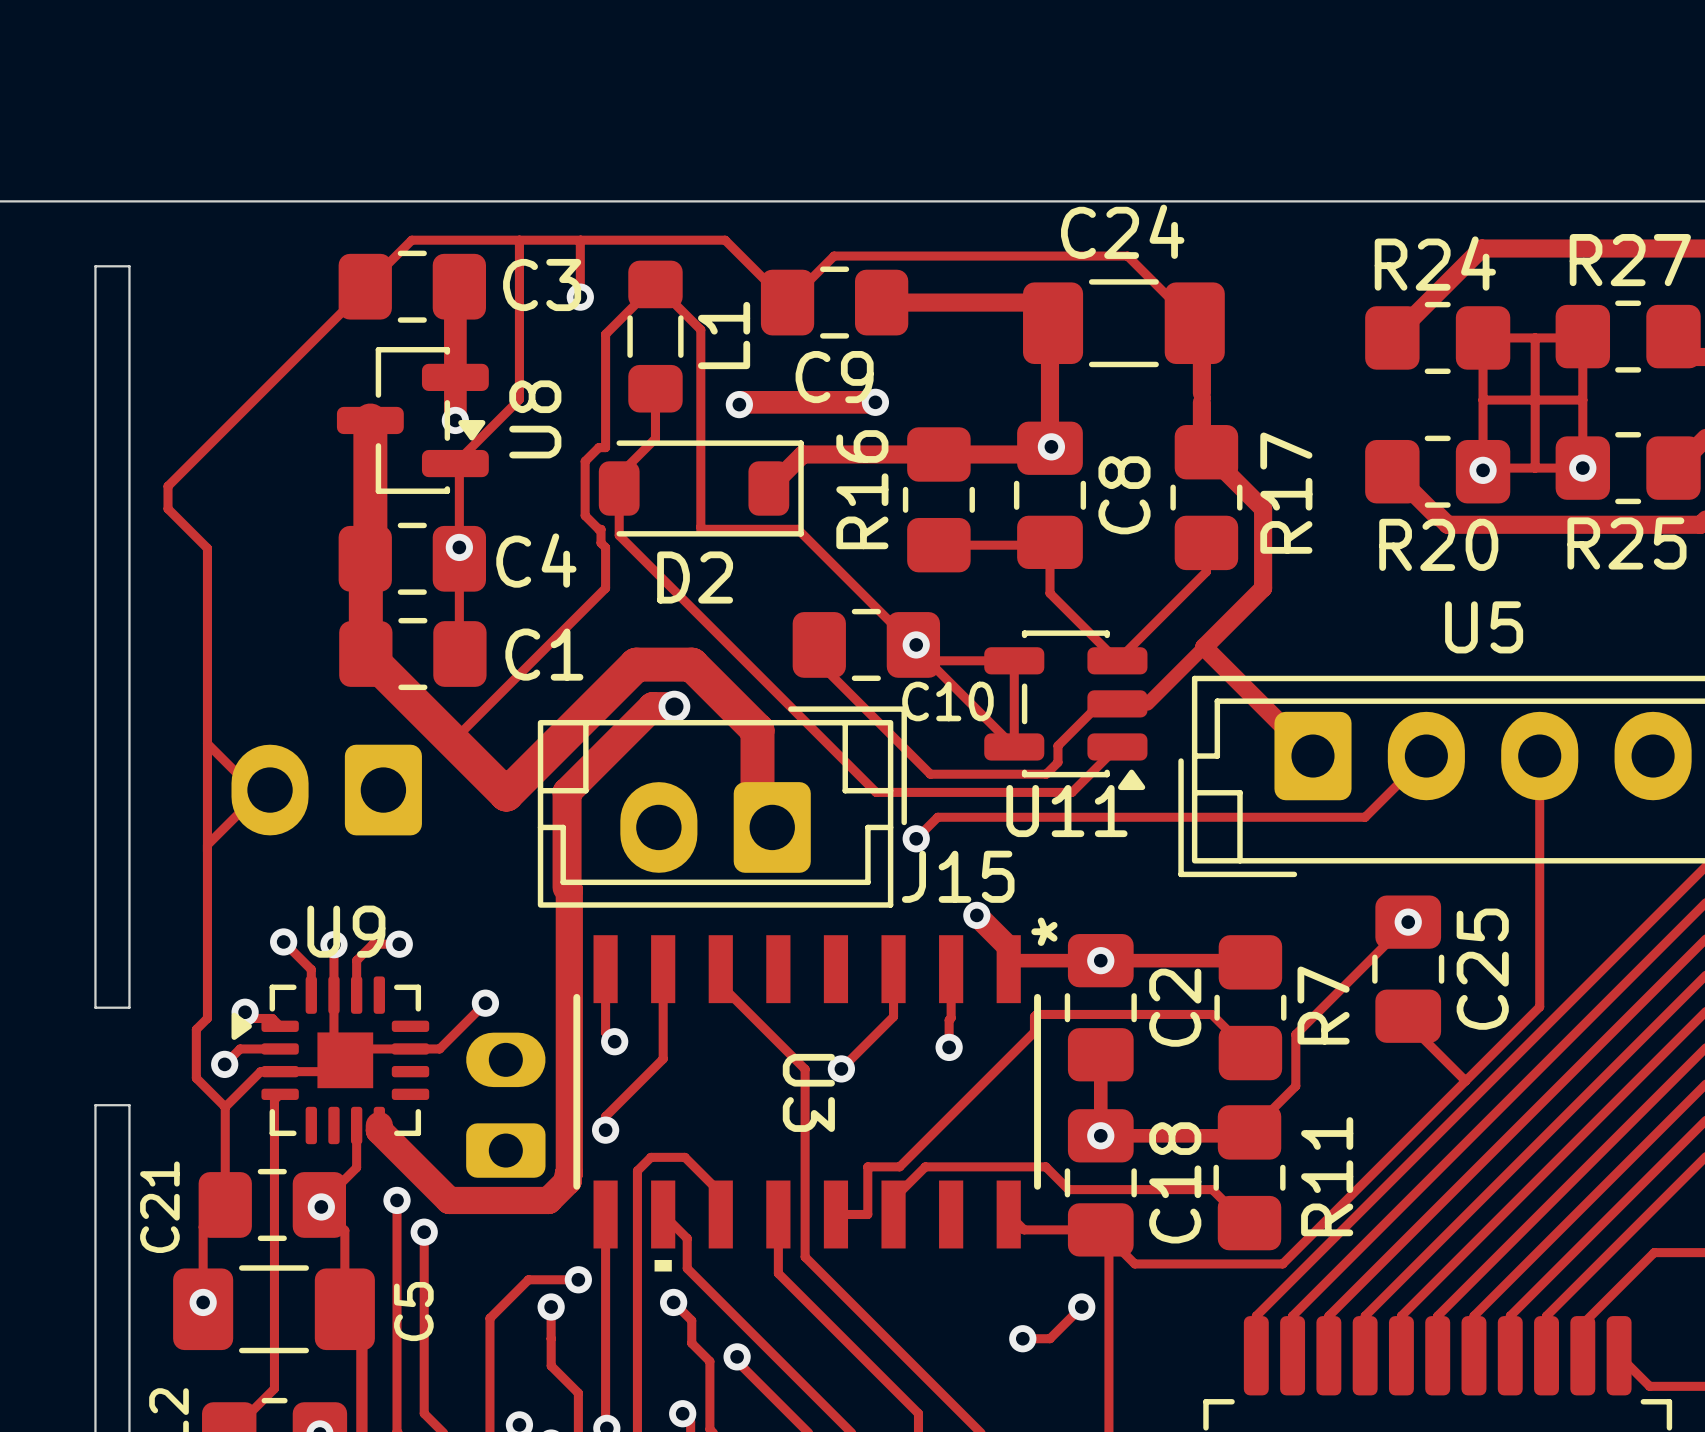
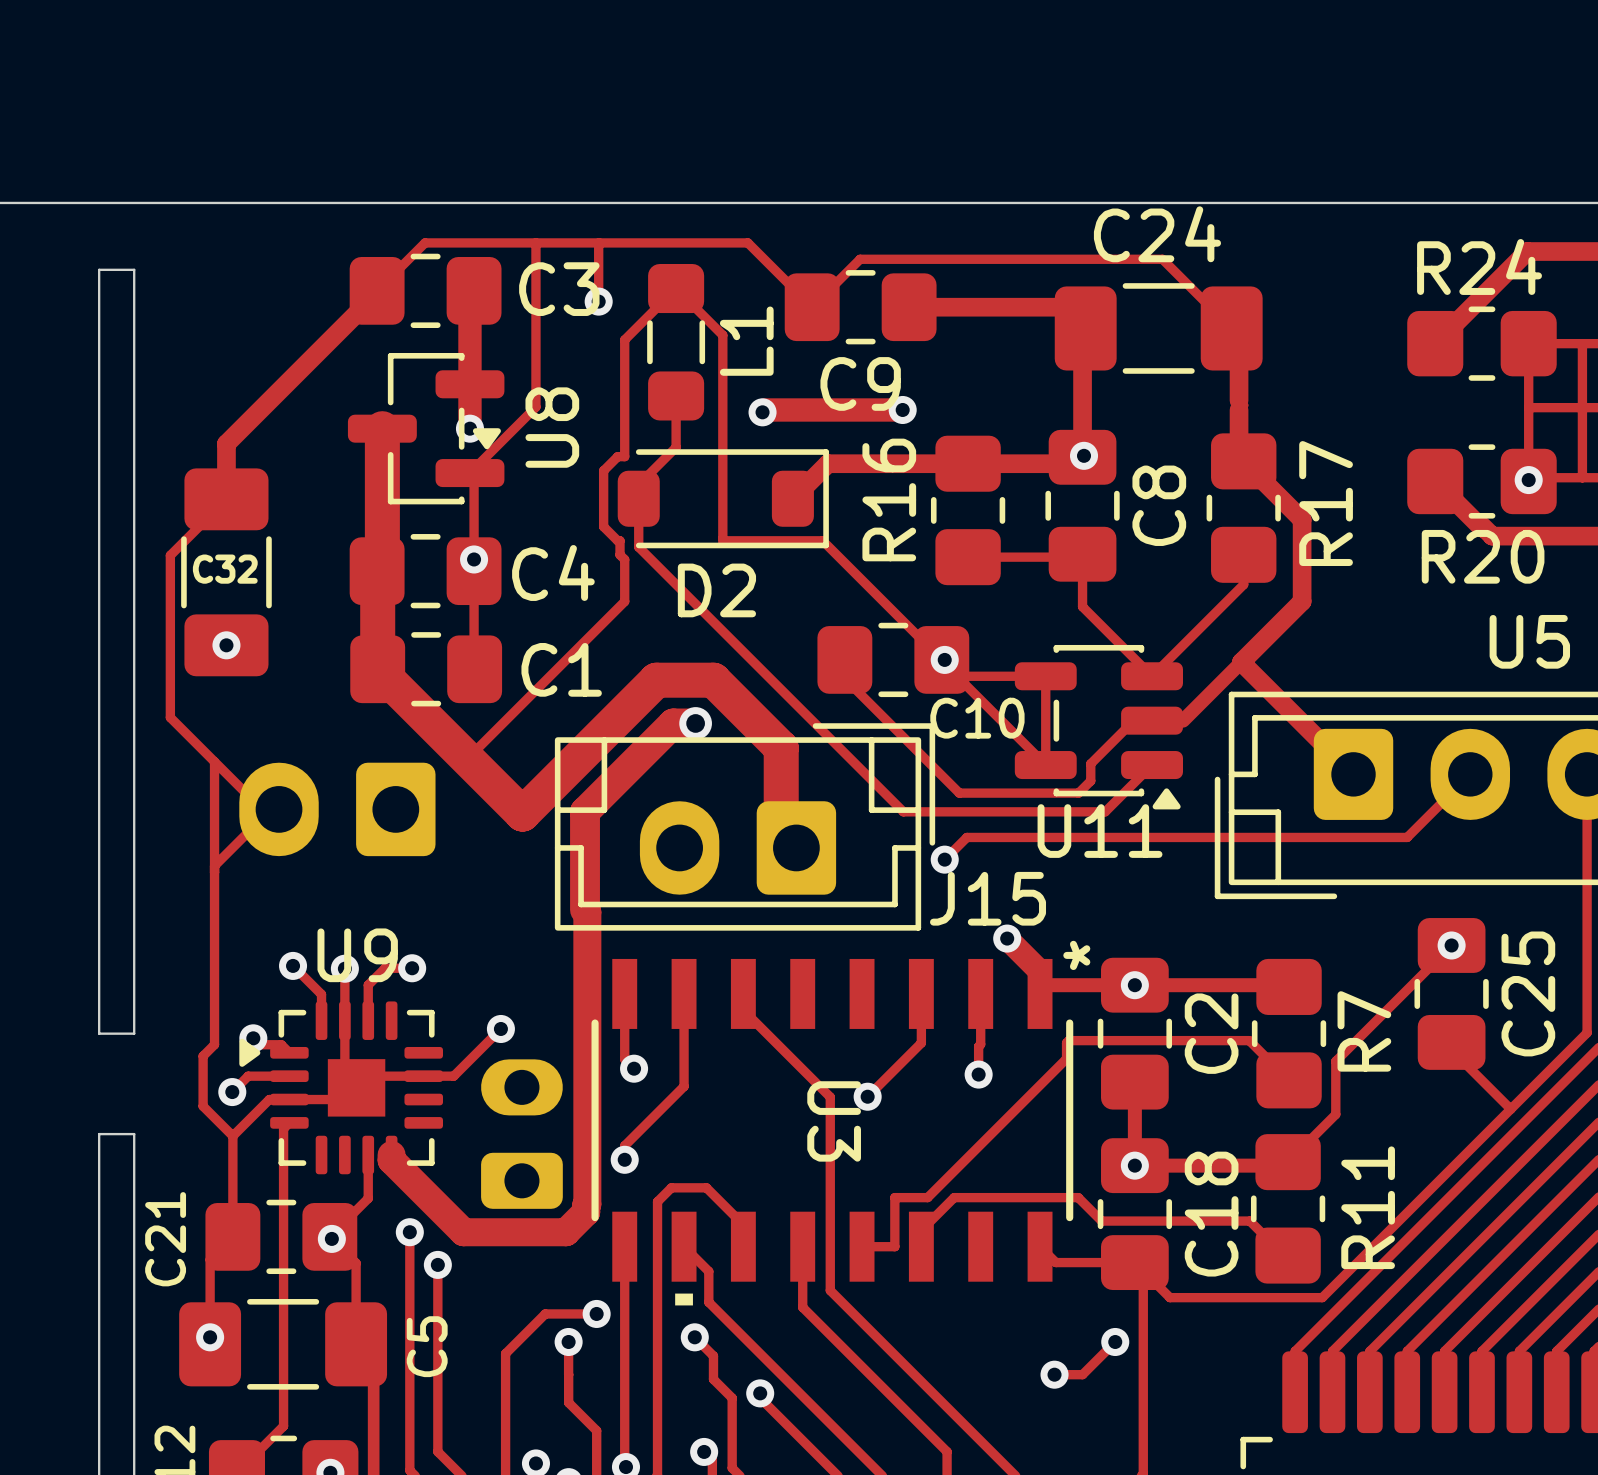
track width: thin (365, 288) (219, 435) -> thick (377, 293) (226, 443)
track: (219, 435) (168, 486) (168, 508) (207, 548) (207, 743) -> (226, 443) (226, 499) (170, 555) (170, 717) (214, 761)
C32: none -> (226, 572)
via: none -> (226, 645)

